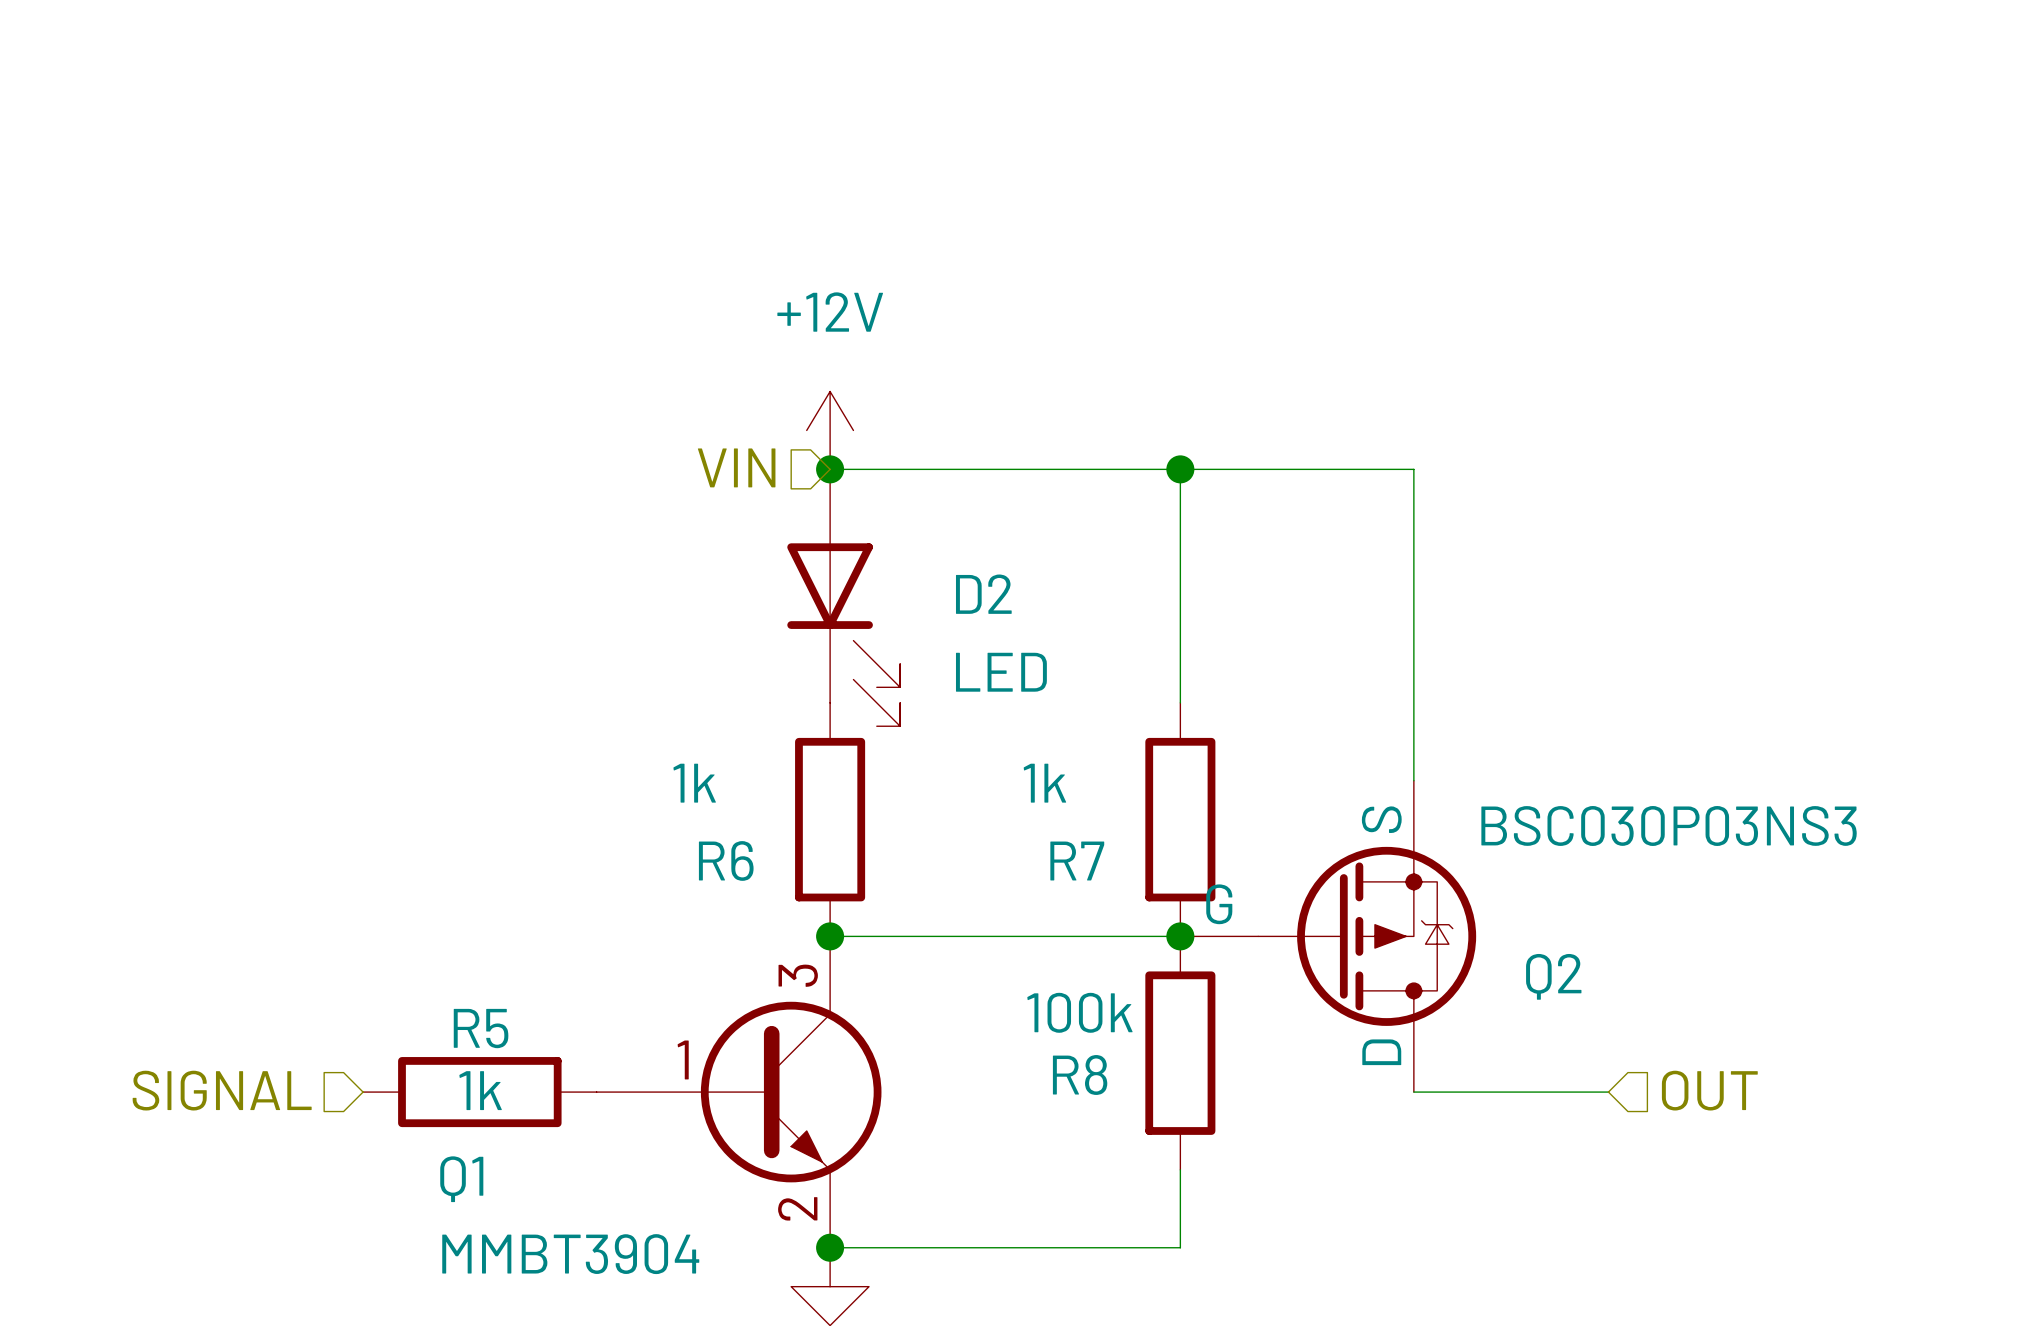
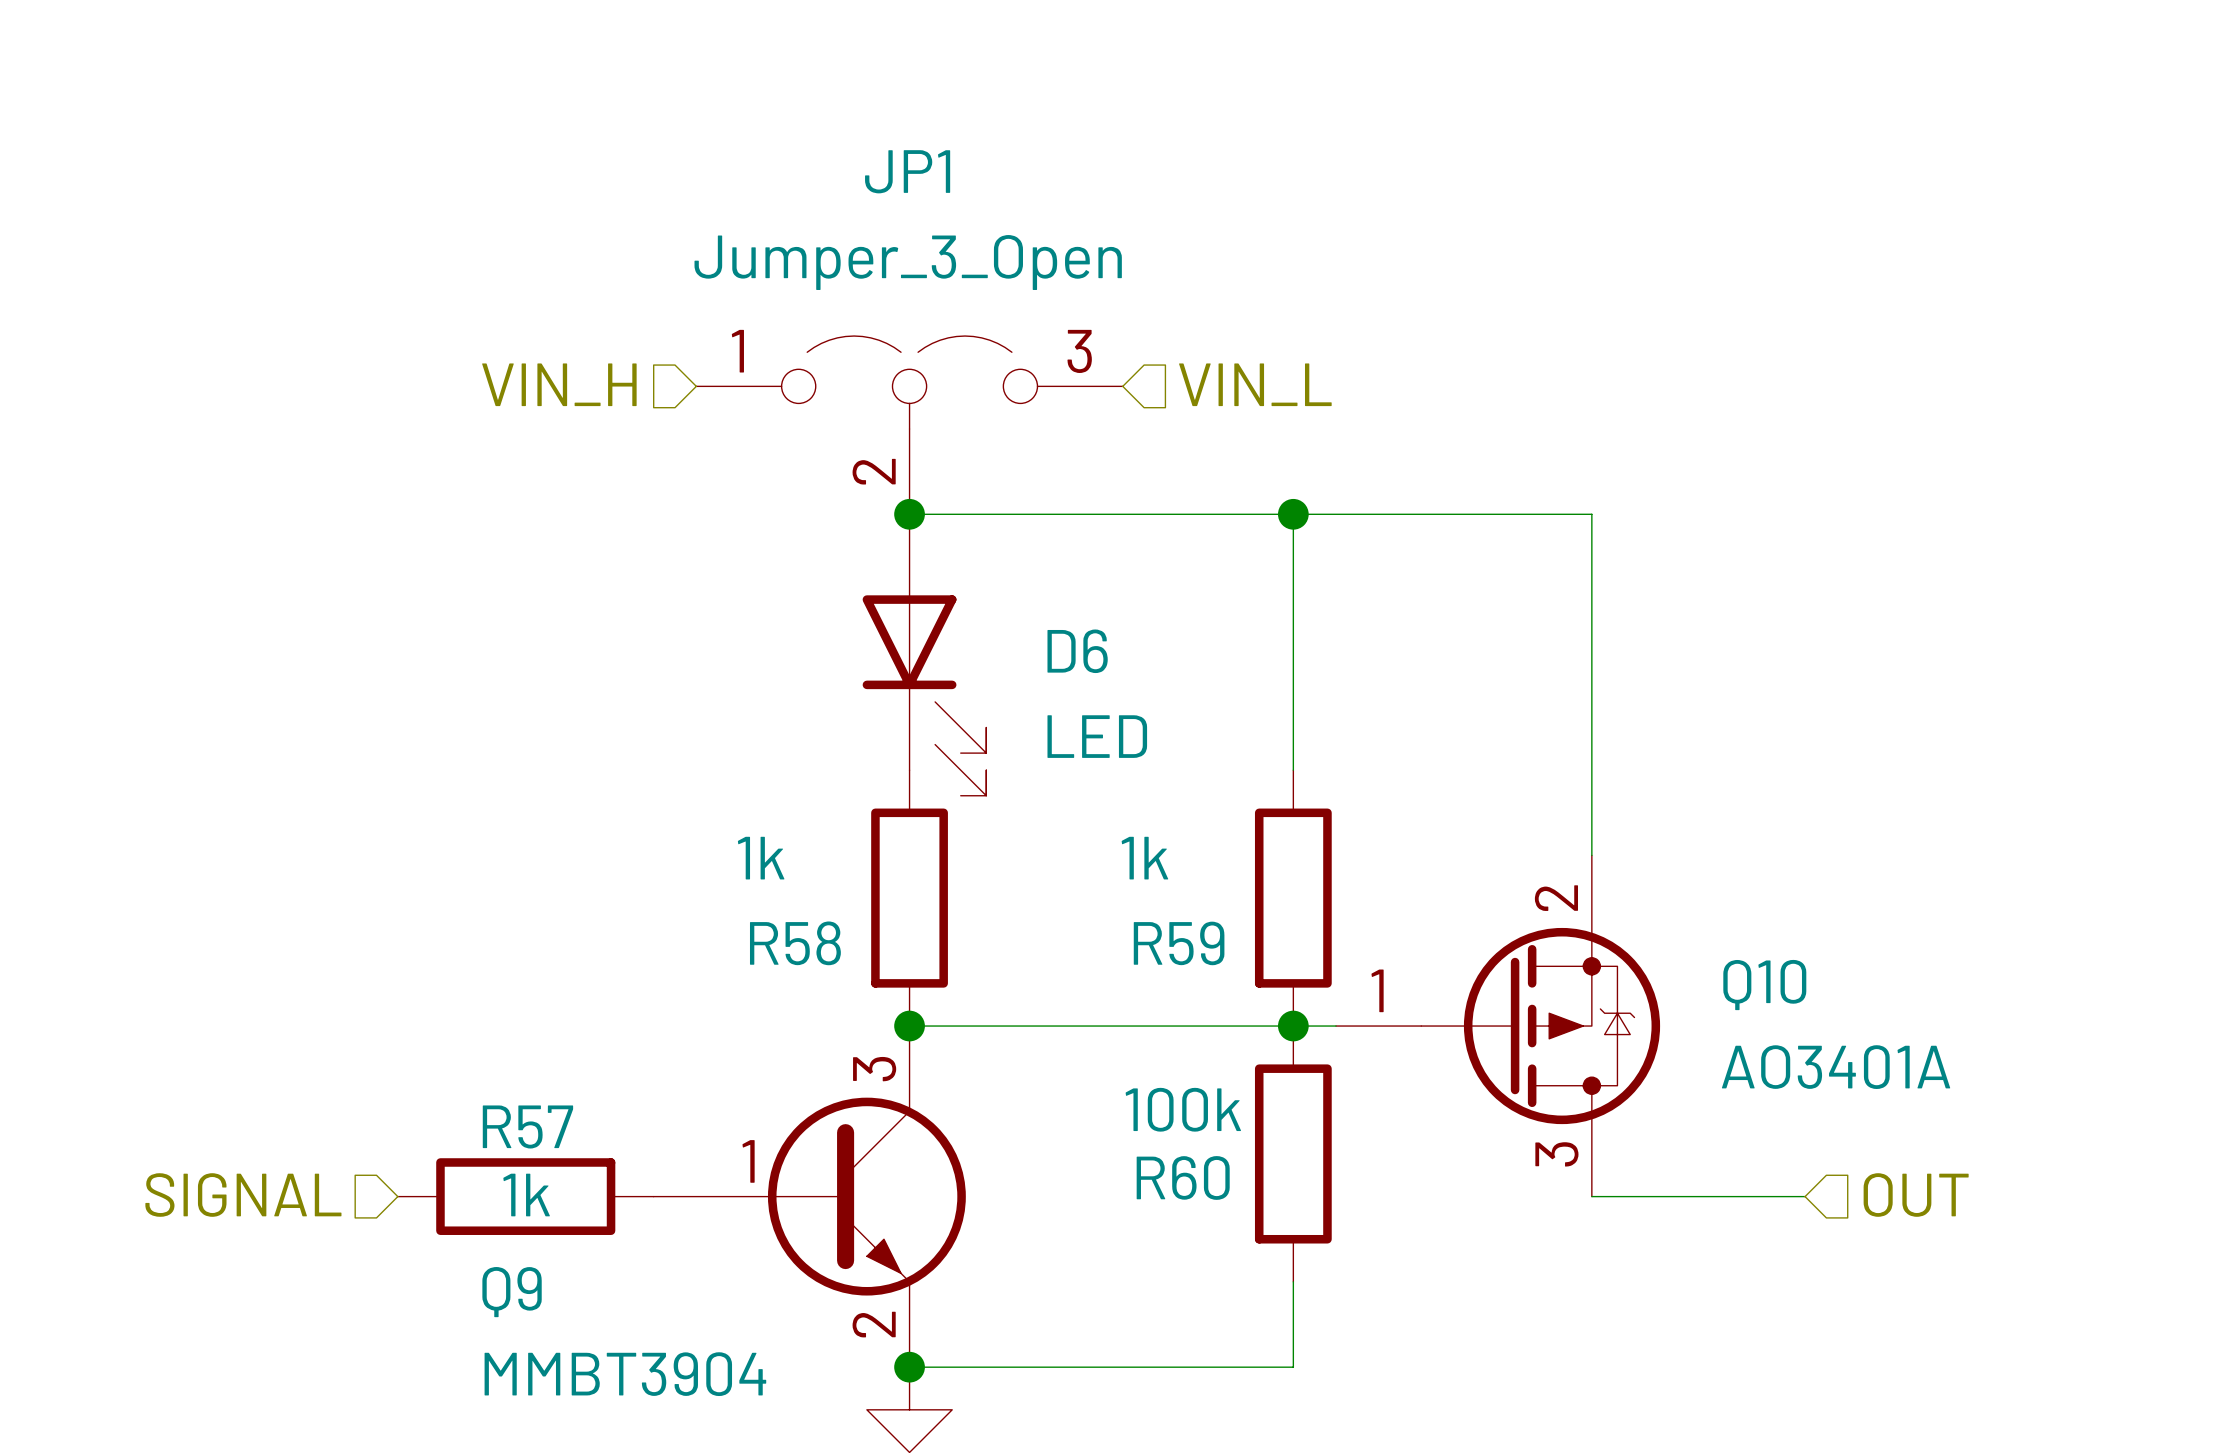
hierarchical label: none -> VIN_H (559, 384)
hierarchical label: none -> VIN_L (1255, 384)
JP1: none -> Jumper_3_Open (909, 425)
power symbol: +12V (830, 430) -> none
hierarchical label: VIN (736, 467) -> none
wire: (1413, 469) (1413, 780) -> (1549, 514) (1591, 514) (1591, 855)
D2 name: D2 (983, 594) -> D6 (1077, 651)
R6 name: R6 (726, 860) -> R58 (795, 943)
R7 name: R7 (1077, 860) -> R59 (1179, 943)
Q2: BSC030P03NS3 (1328, 936) -> none
Q10: none -> AO3401A (1498, 1026)
R5 name: R5 (481, 1028) -> R57 (527, 1126)
R8 name: R8 (1080, 1074) -> R60 (1183, 1177)
hierarchical label position: OUT (1709, 1090) -> OUT (1916, 1195)
wire: (1413, 1092) (1452, 1092) -> (1762, 1196) (1805, 1196)
Q1 name: Q1 (461, 1179) -> Q9 (512, 1292)

